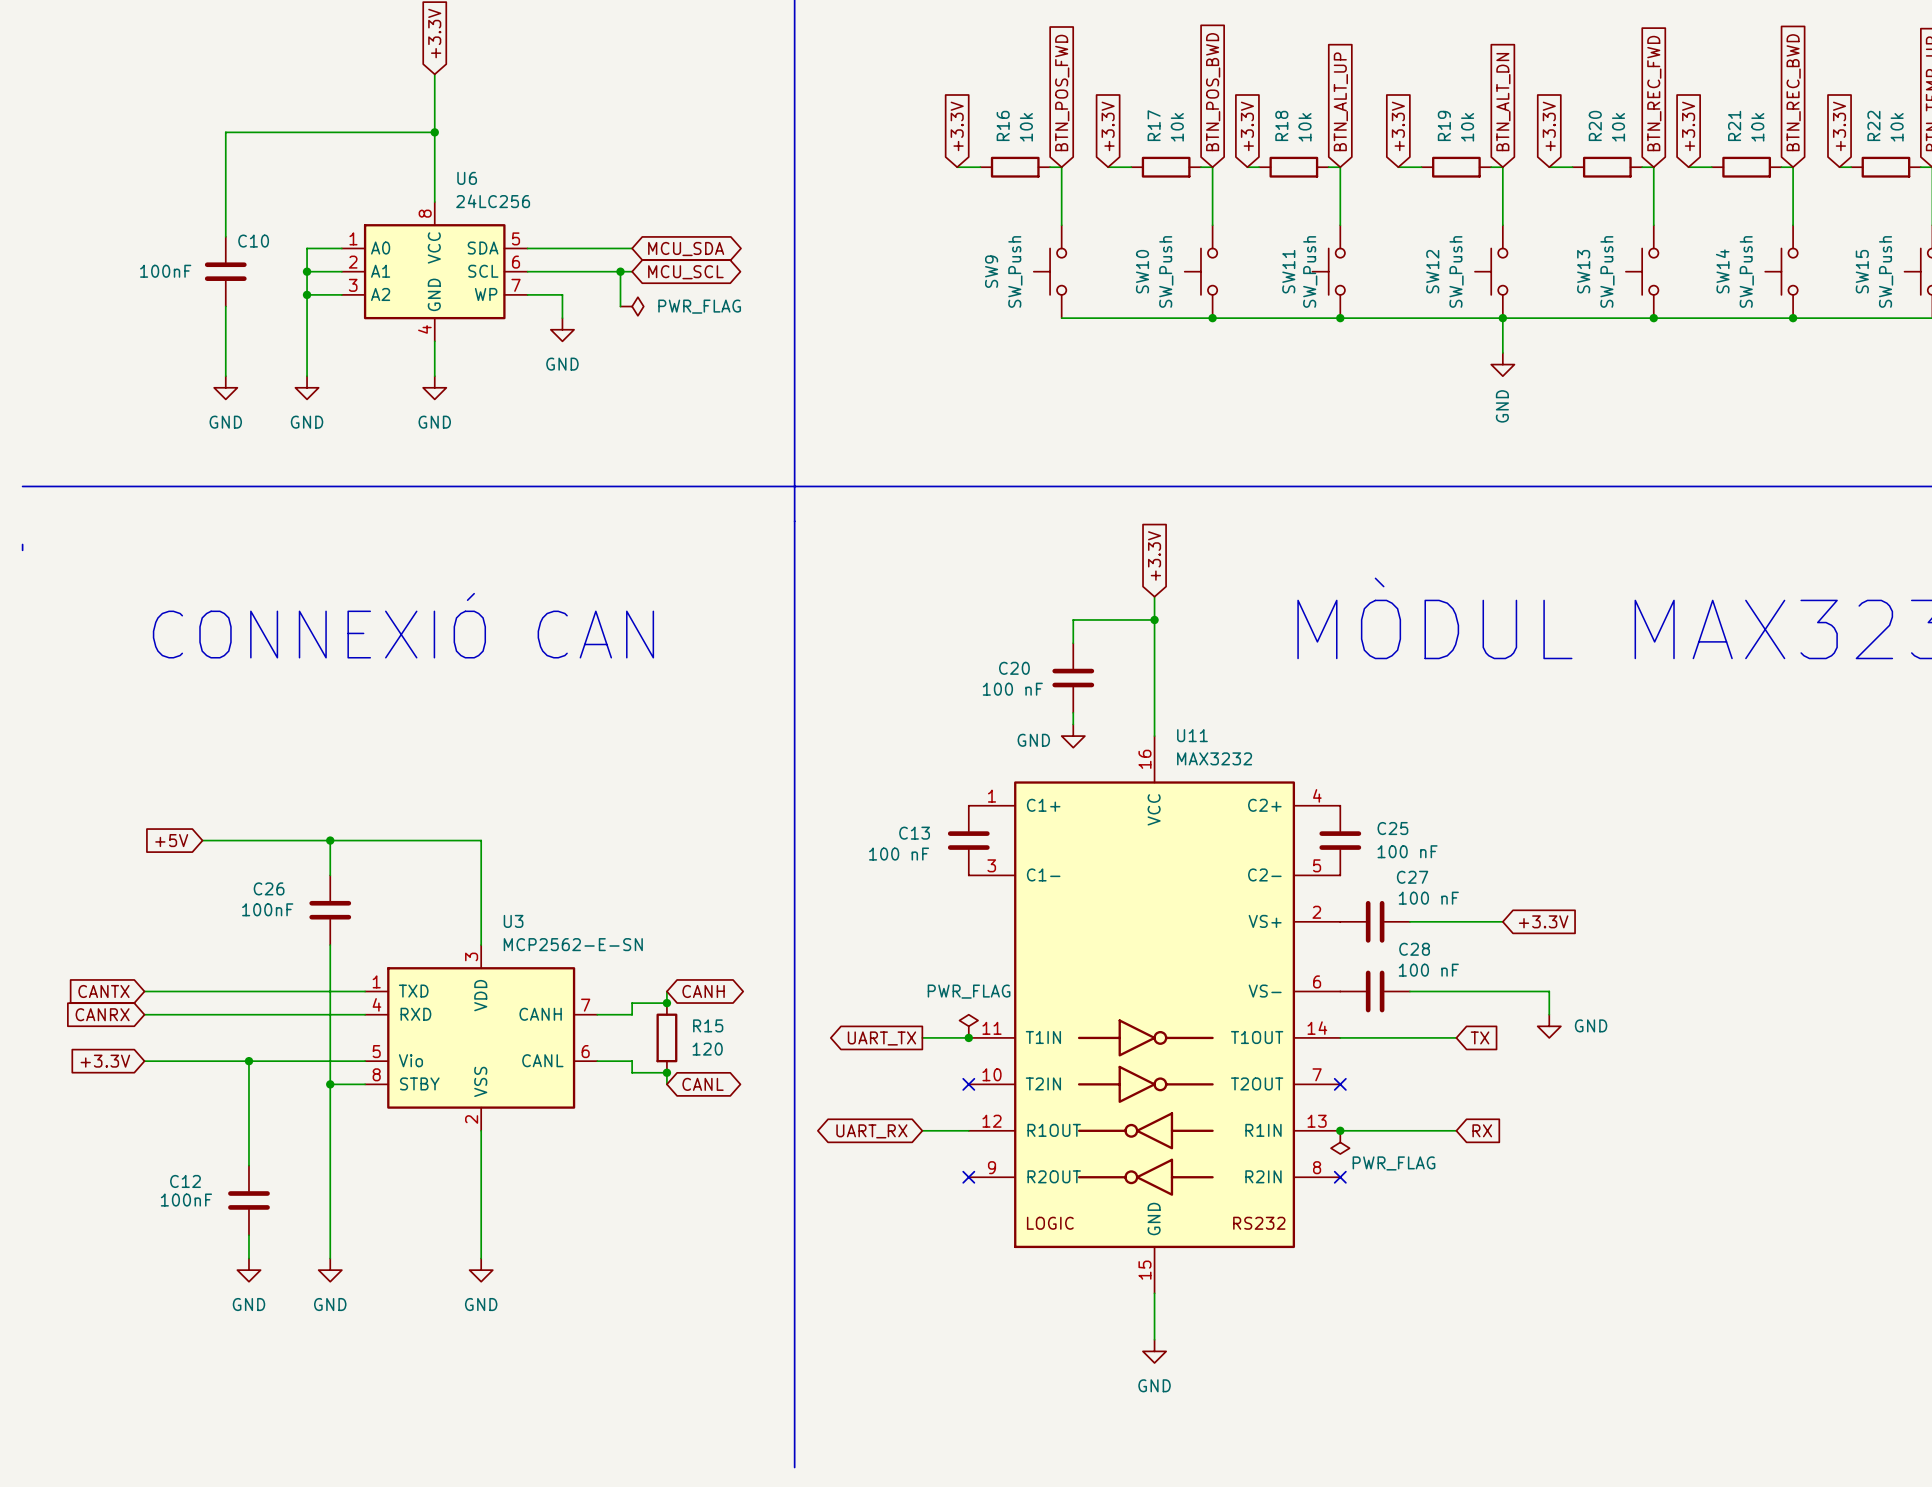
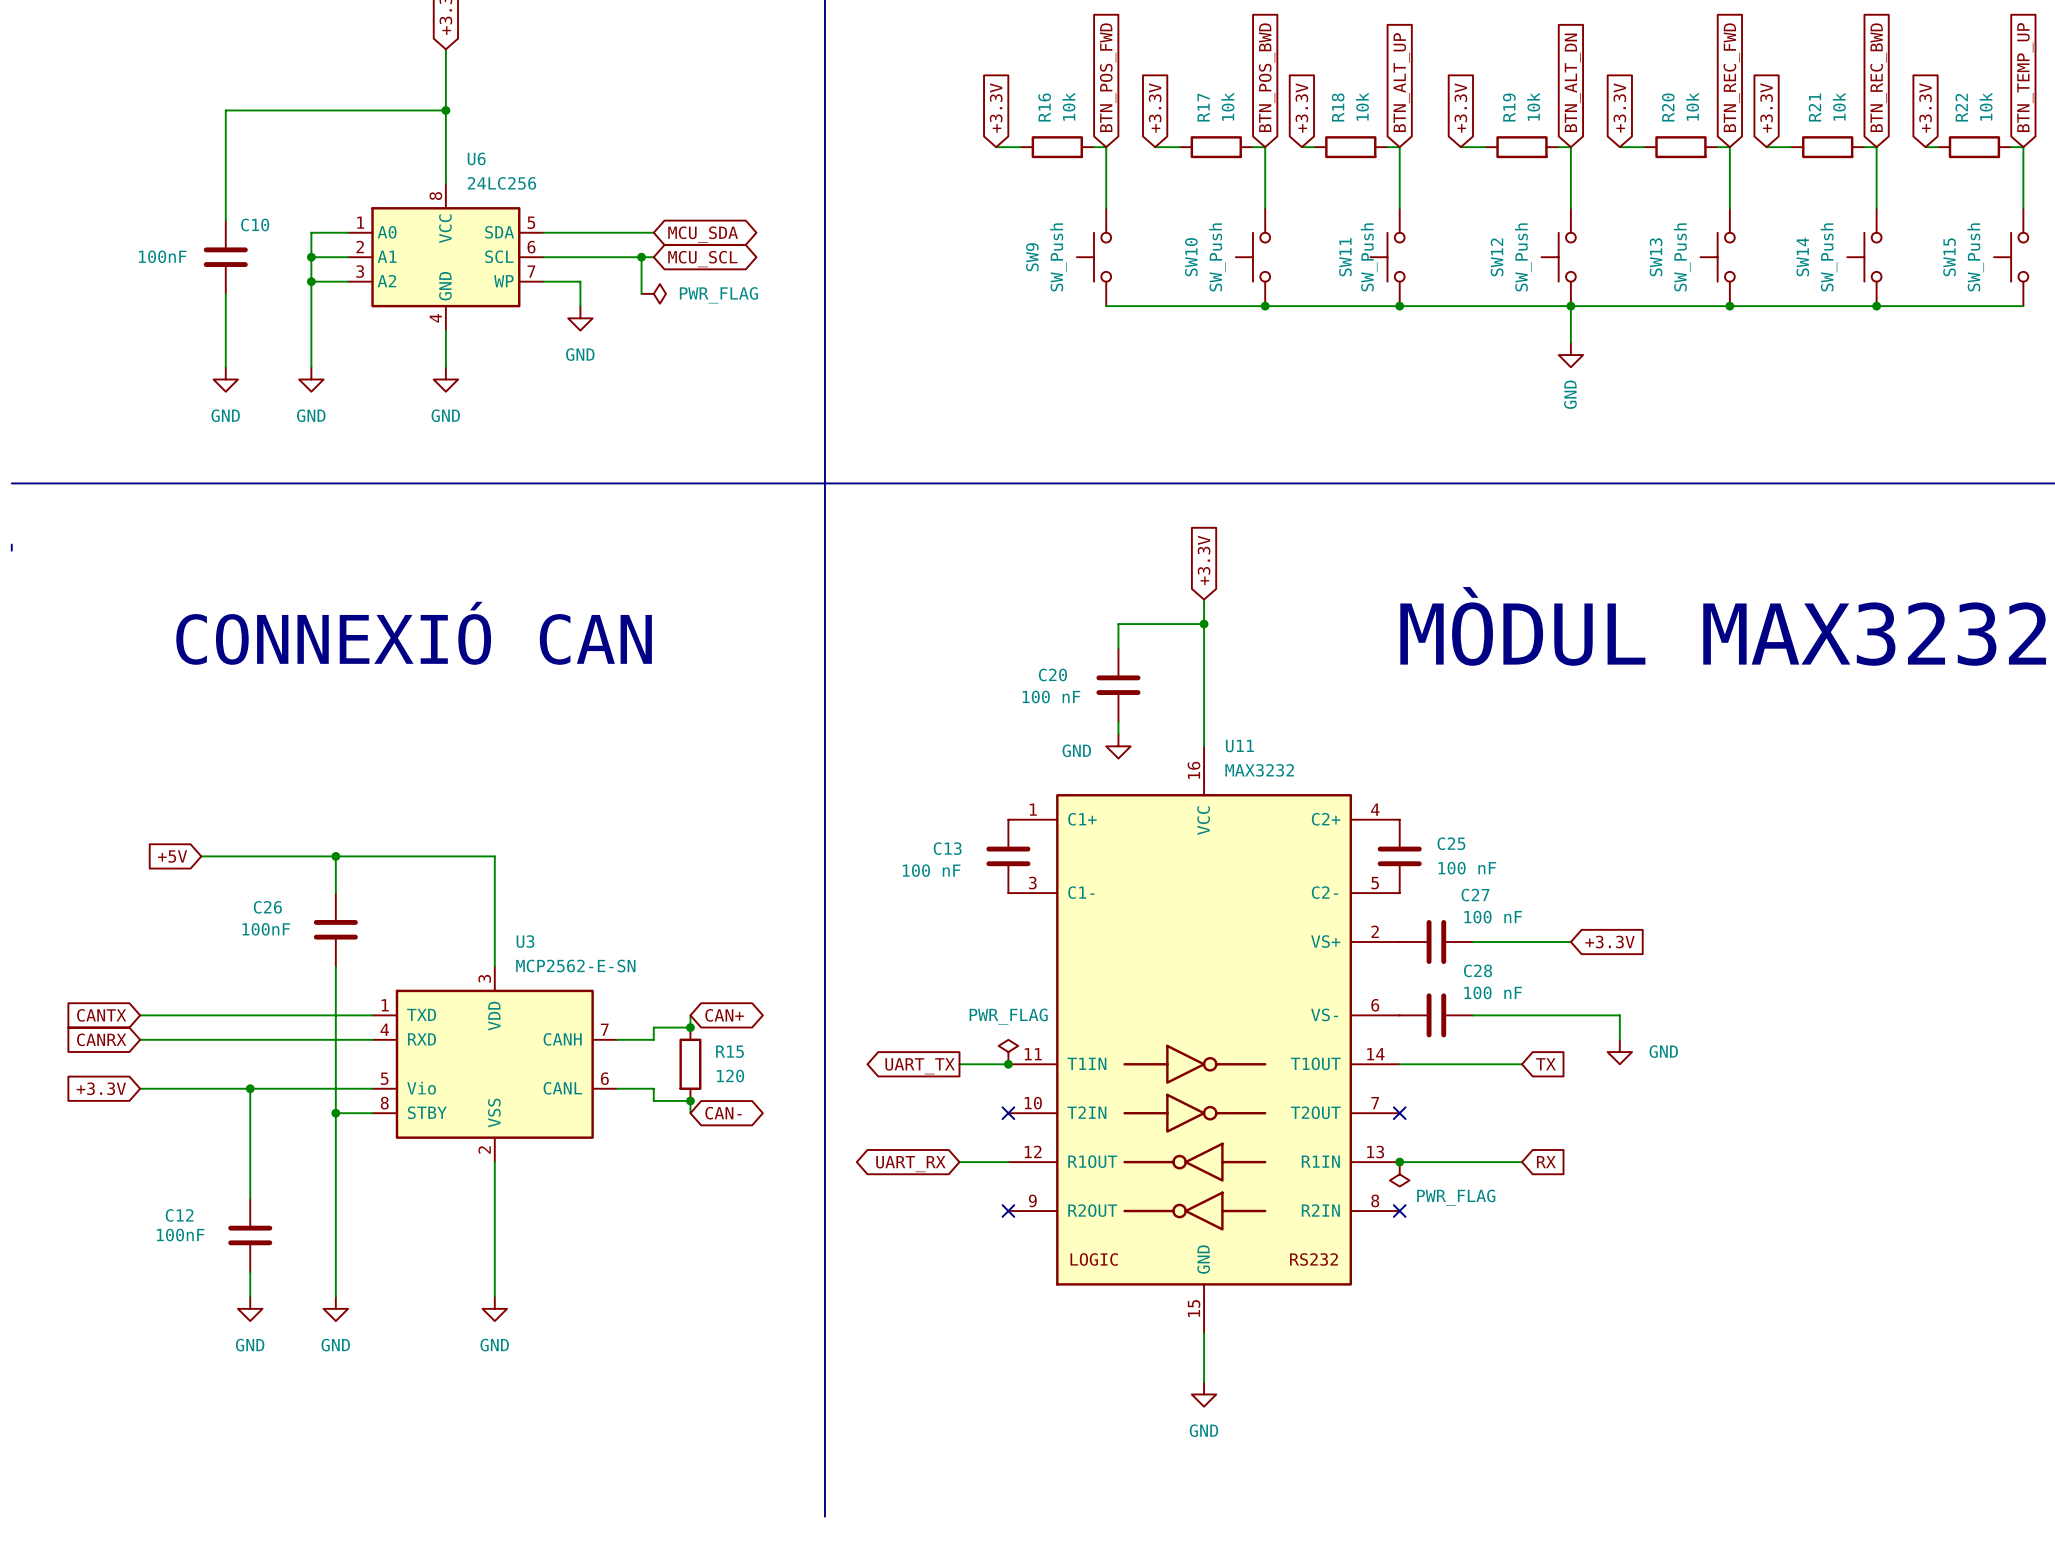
global label: CANH (703, 991) -> CAN+ (724, 1015)
global label: CANL (703, 1084) -> CAN- (723, 1113)

